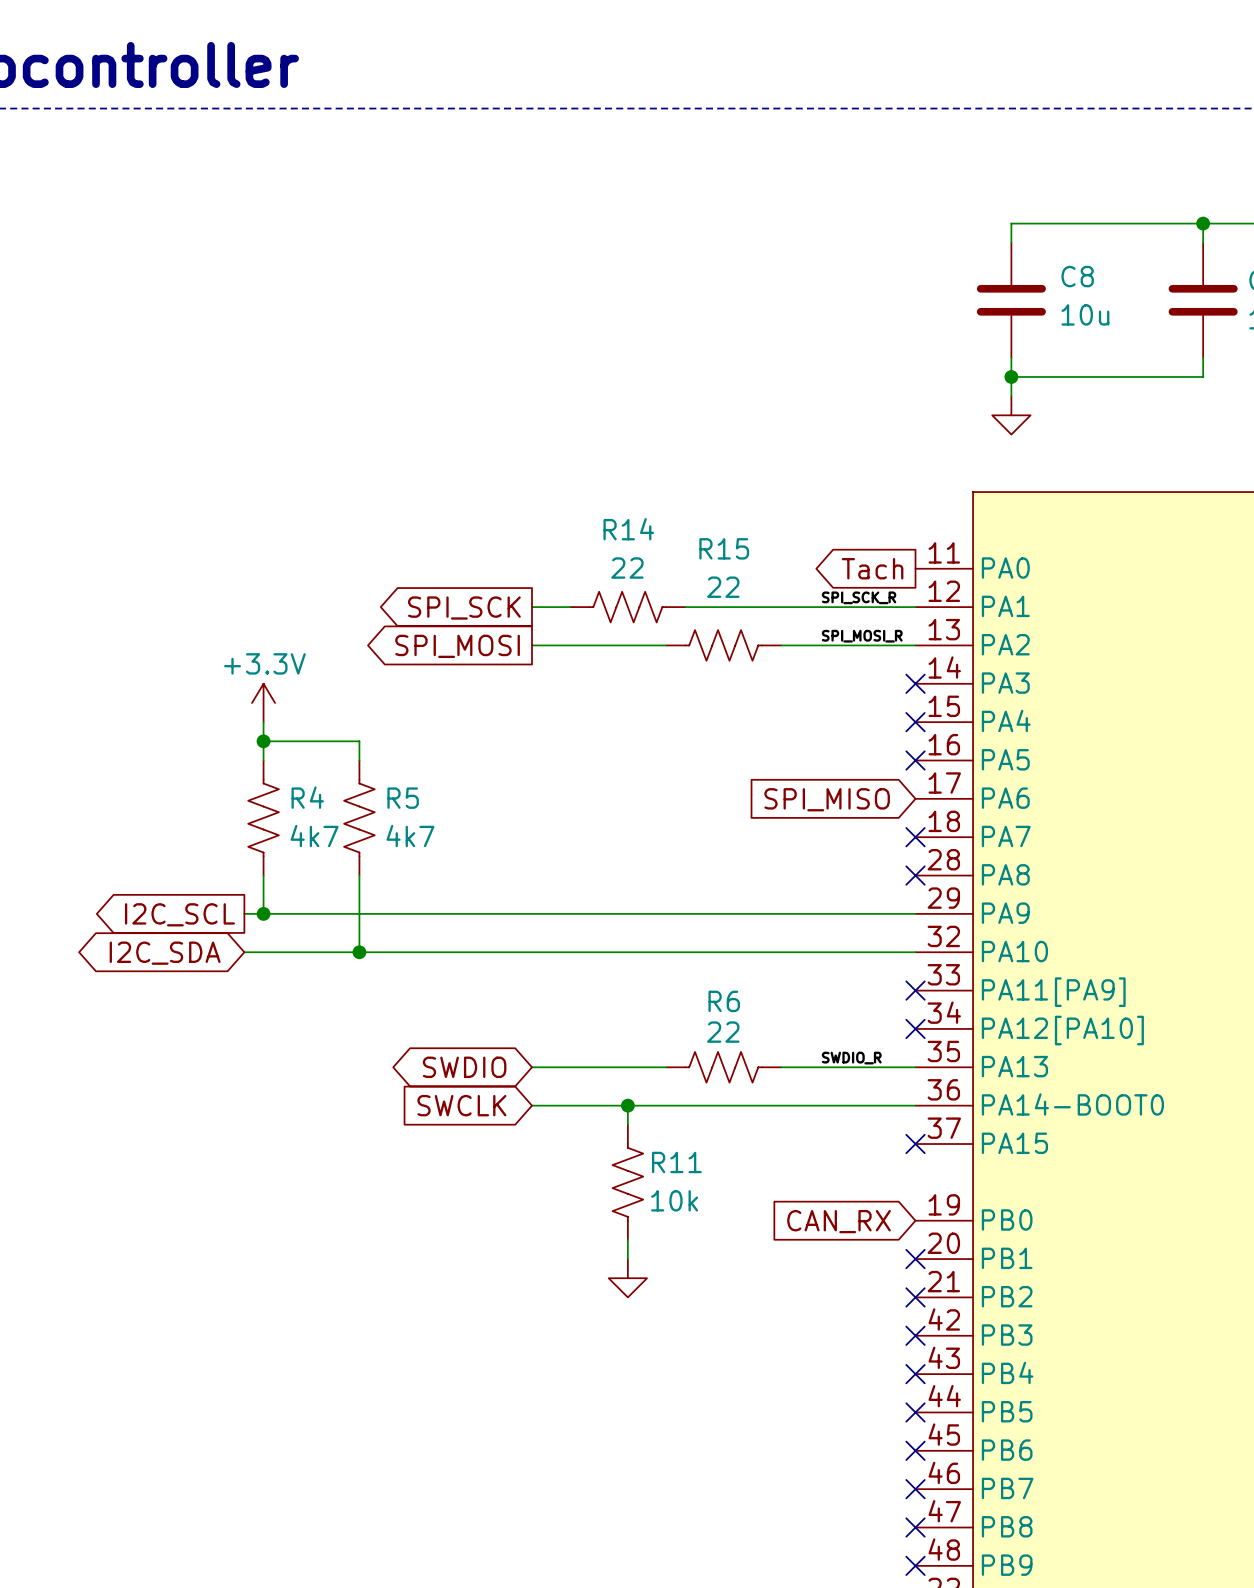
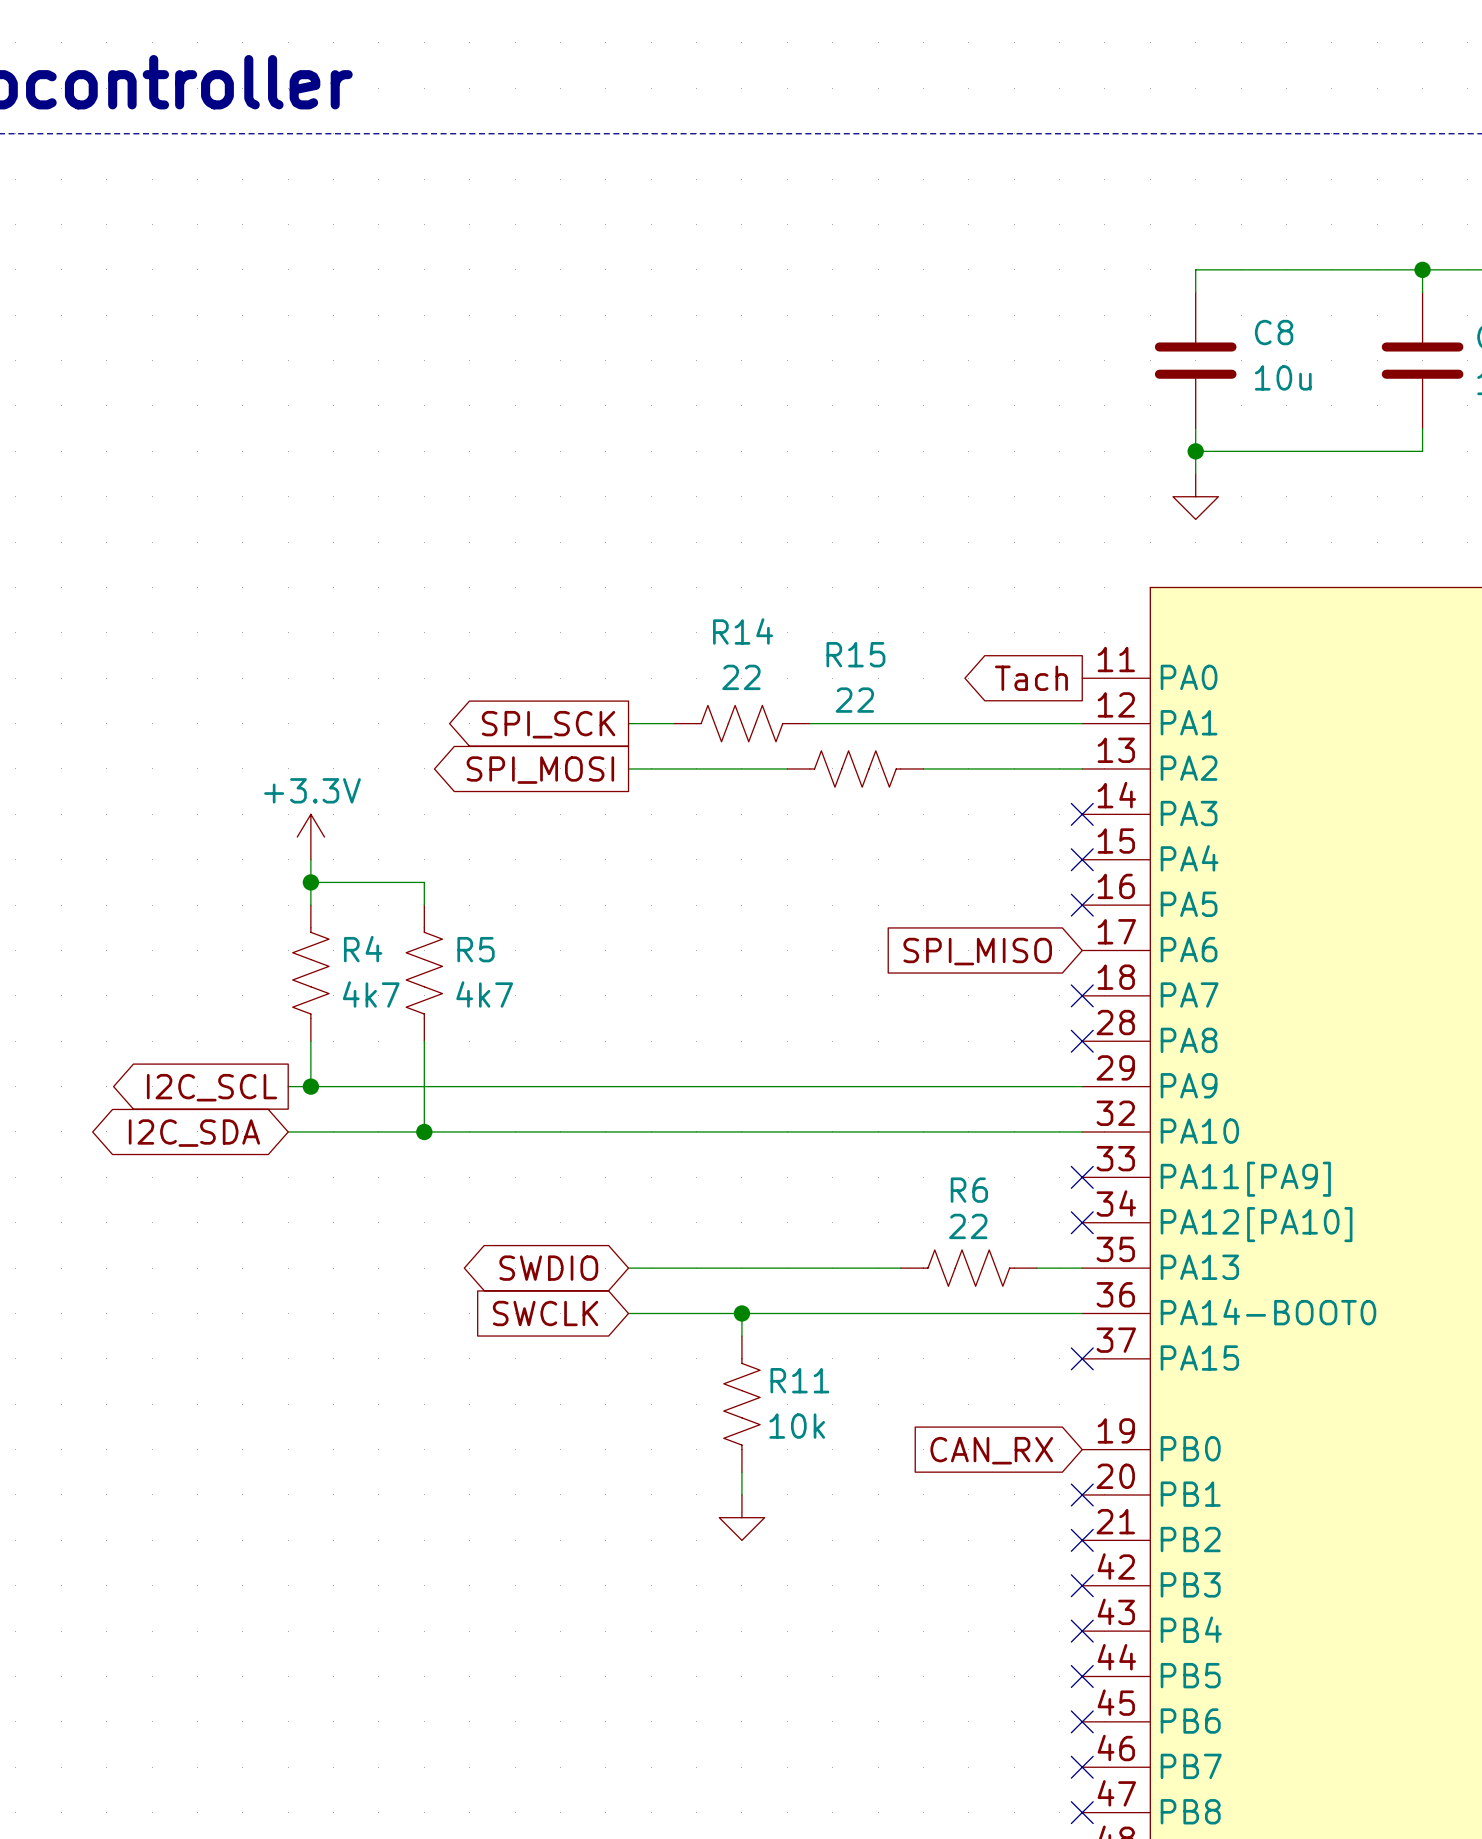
label: SPI_SCK_R (859, 597) -> none
label: SPI_MOSI_R (862, 636) -> none
label: SWDIO_R (851, 1058) -> none
R6 position: (723, 1067) -> (968, 1268)
wire: (781, 1067) (877, 1067) -> (787, 1268) (900, 1268)

